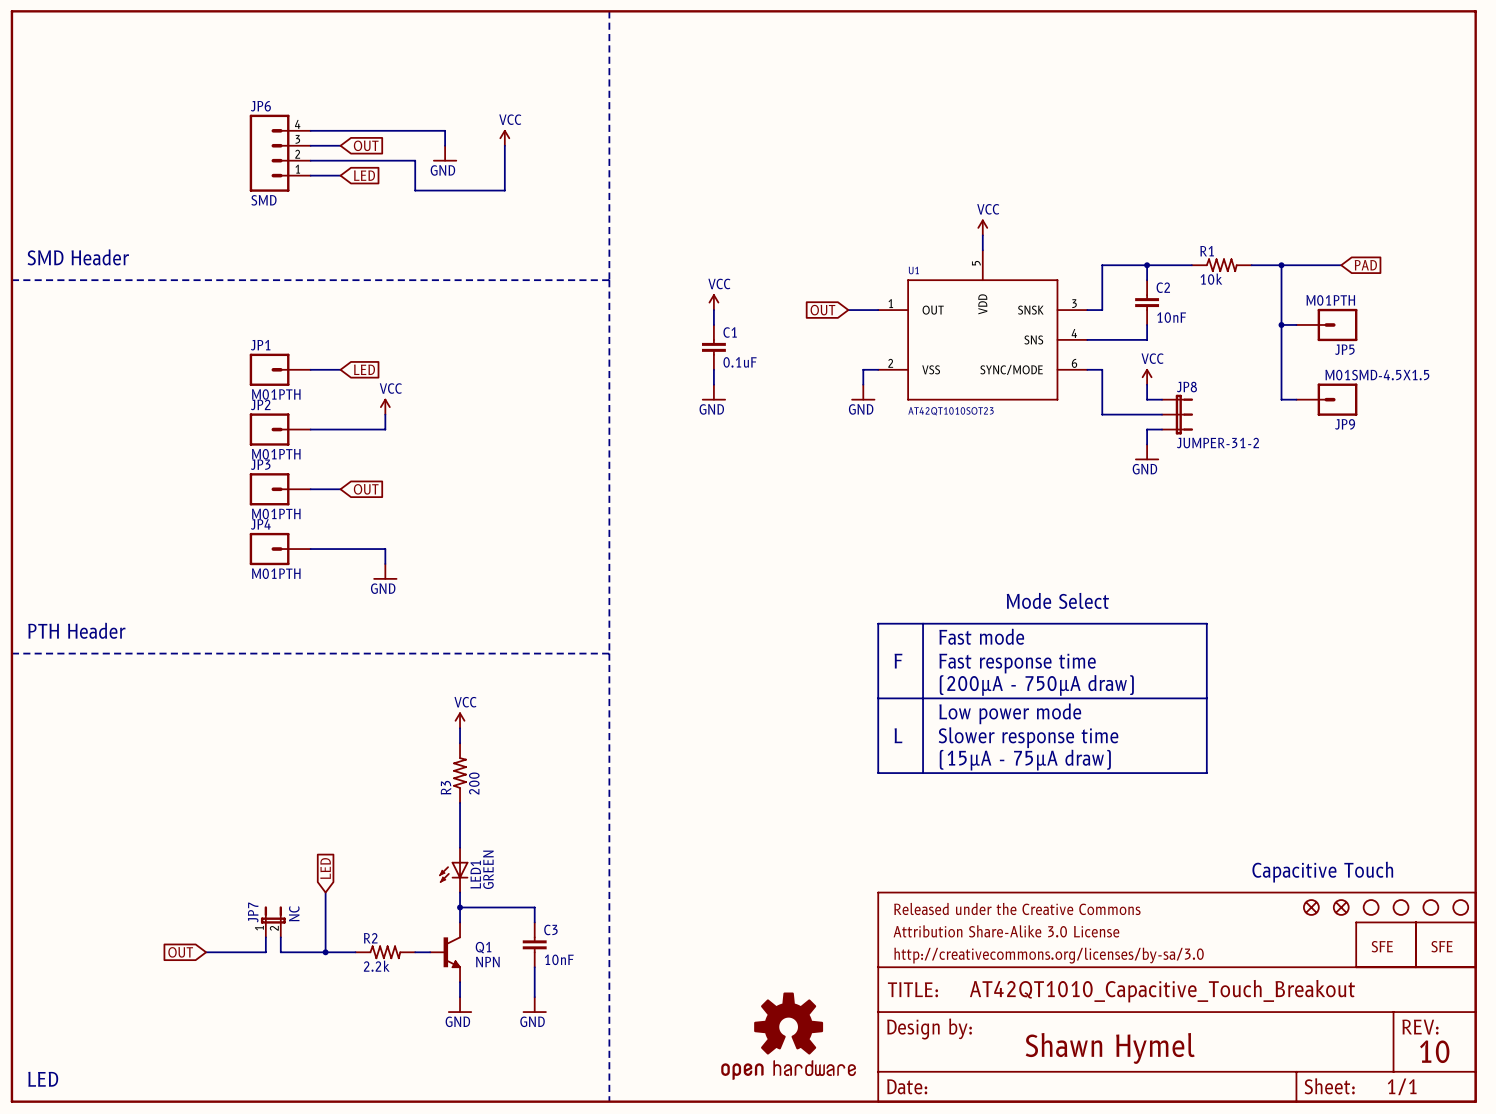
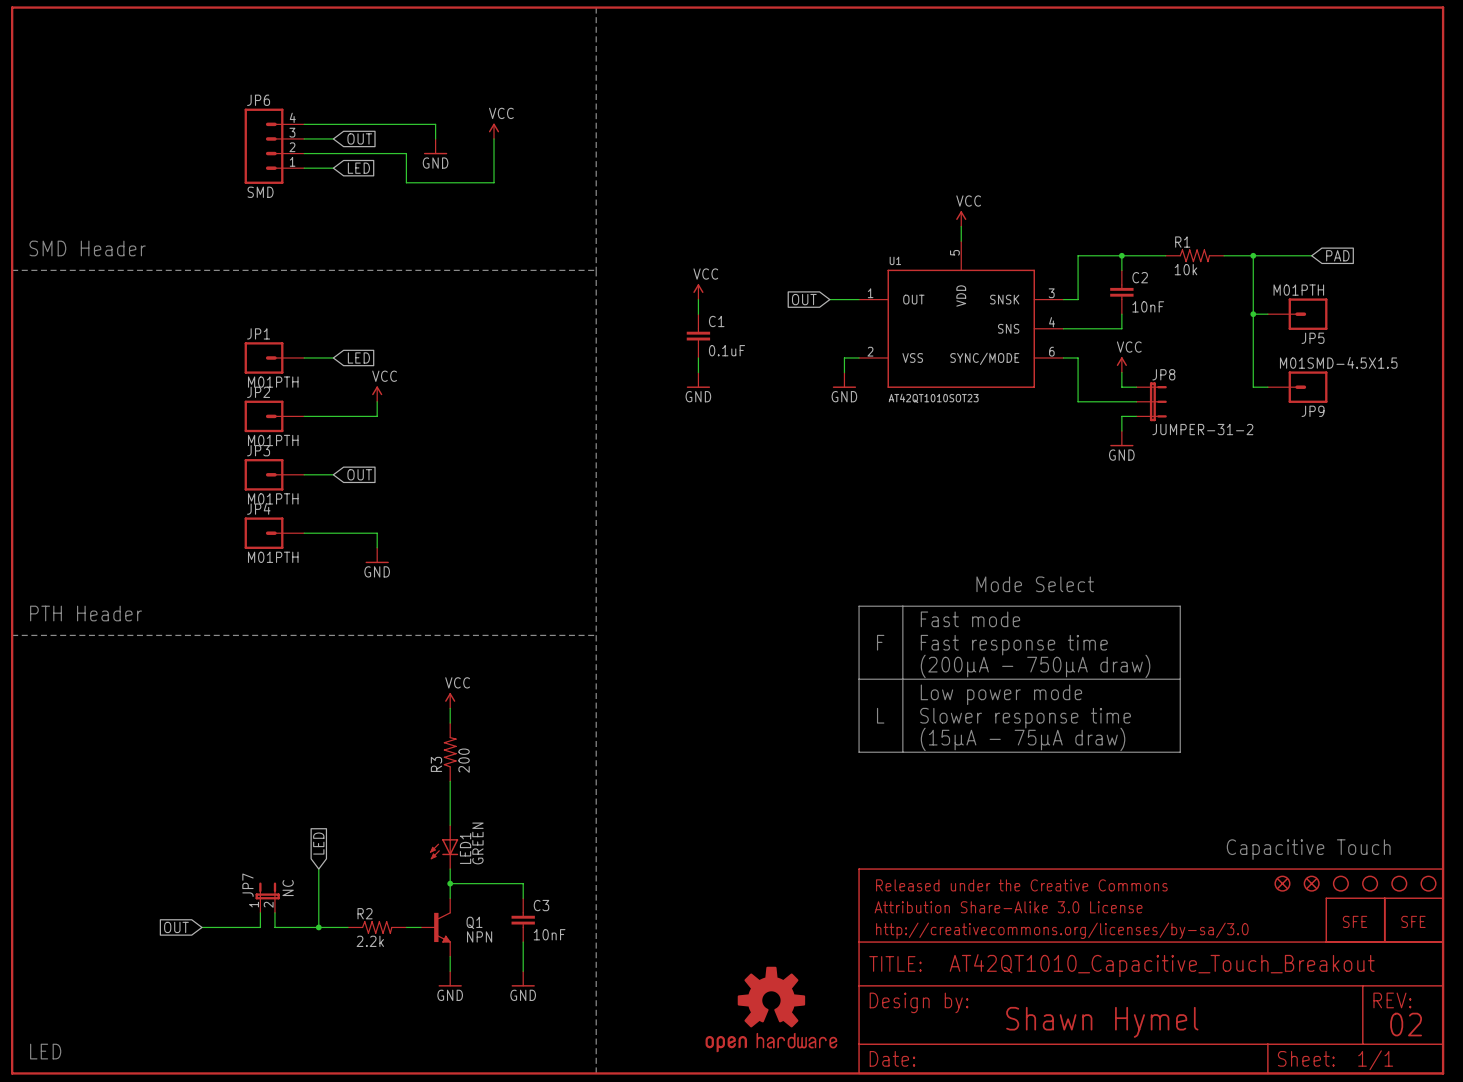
text: 10 (1434, 1051) -> 02 (1406, 1024)

